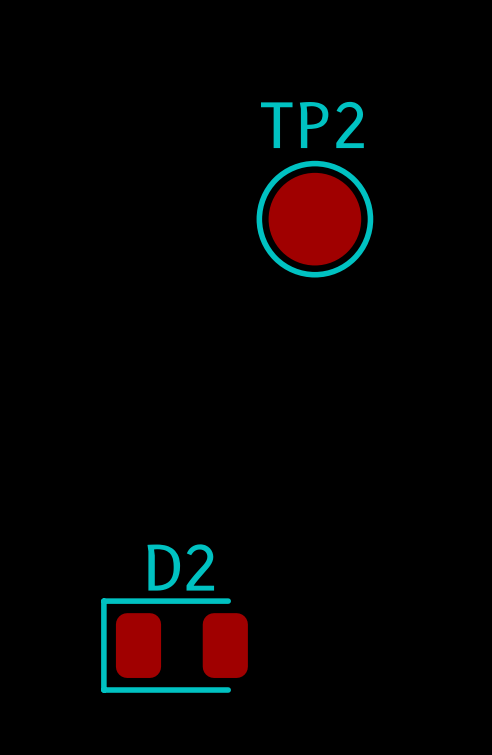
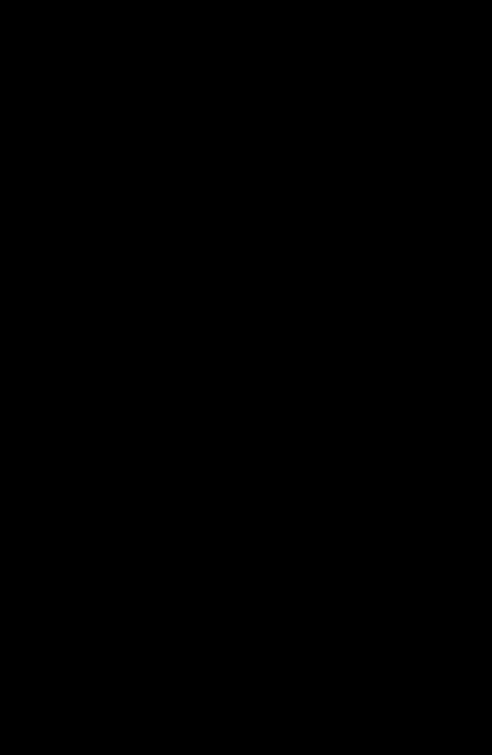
TP2: (314, 219) -> none
D2: (174, 645) -> none

